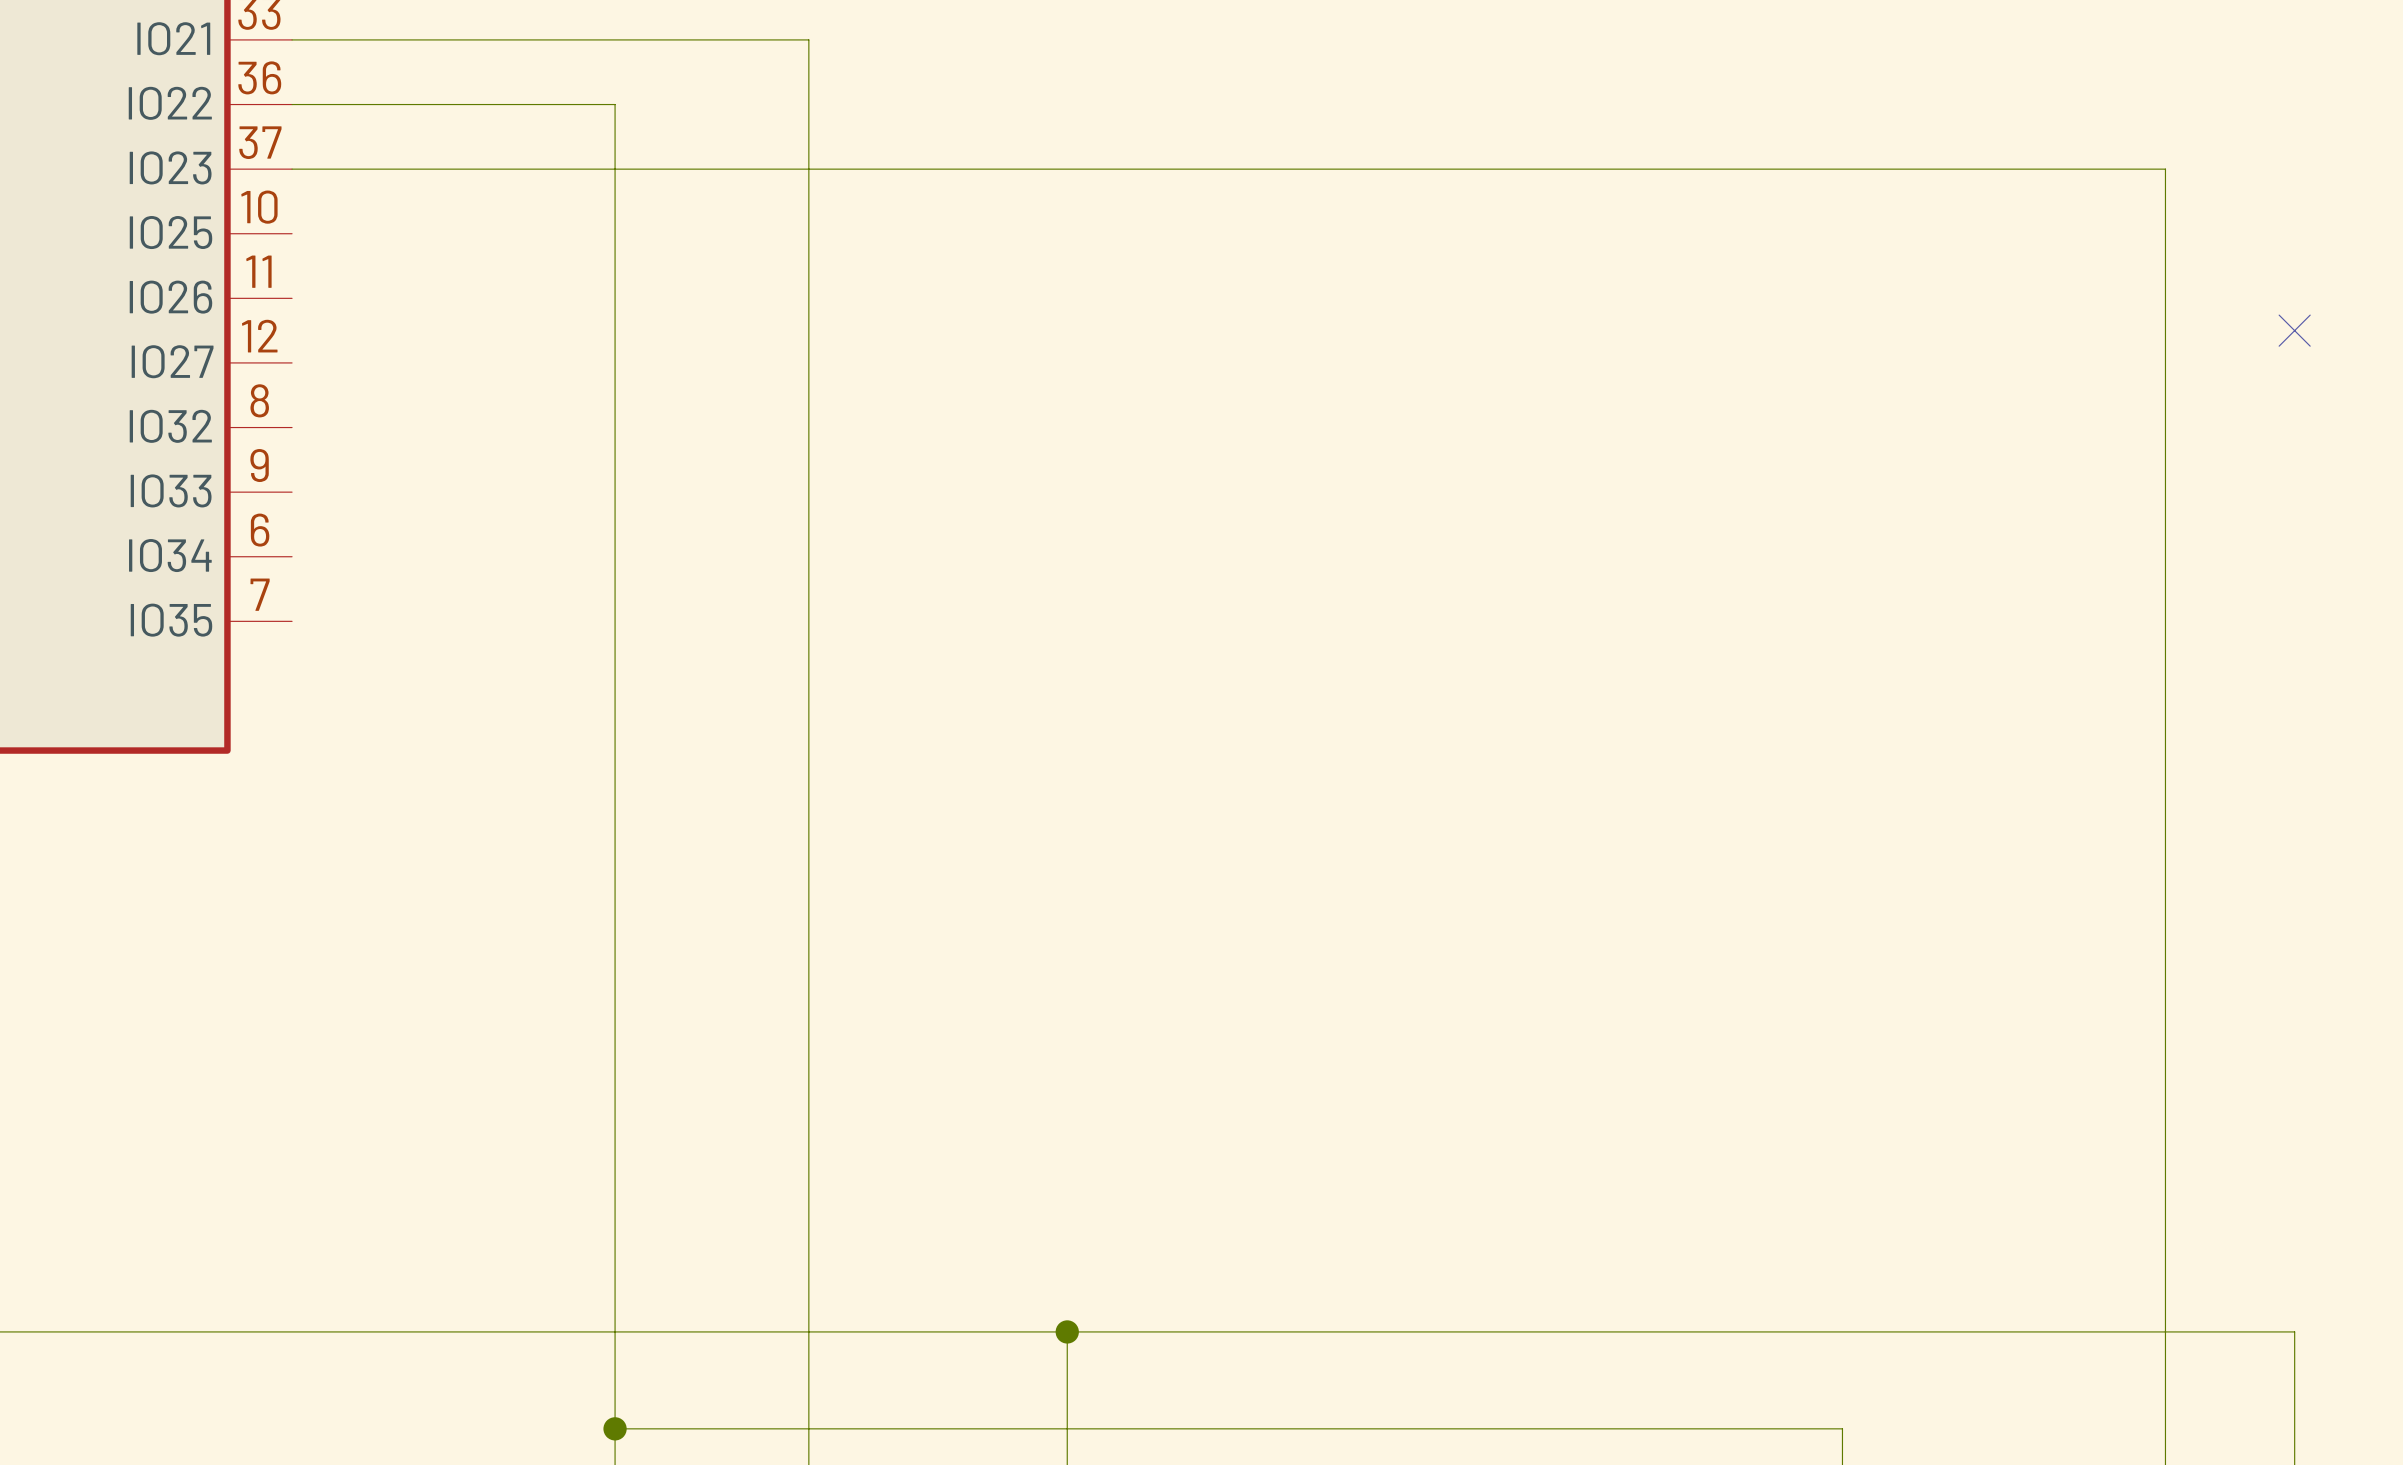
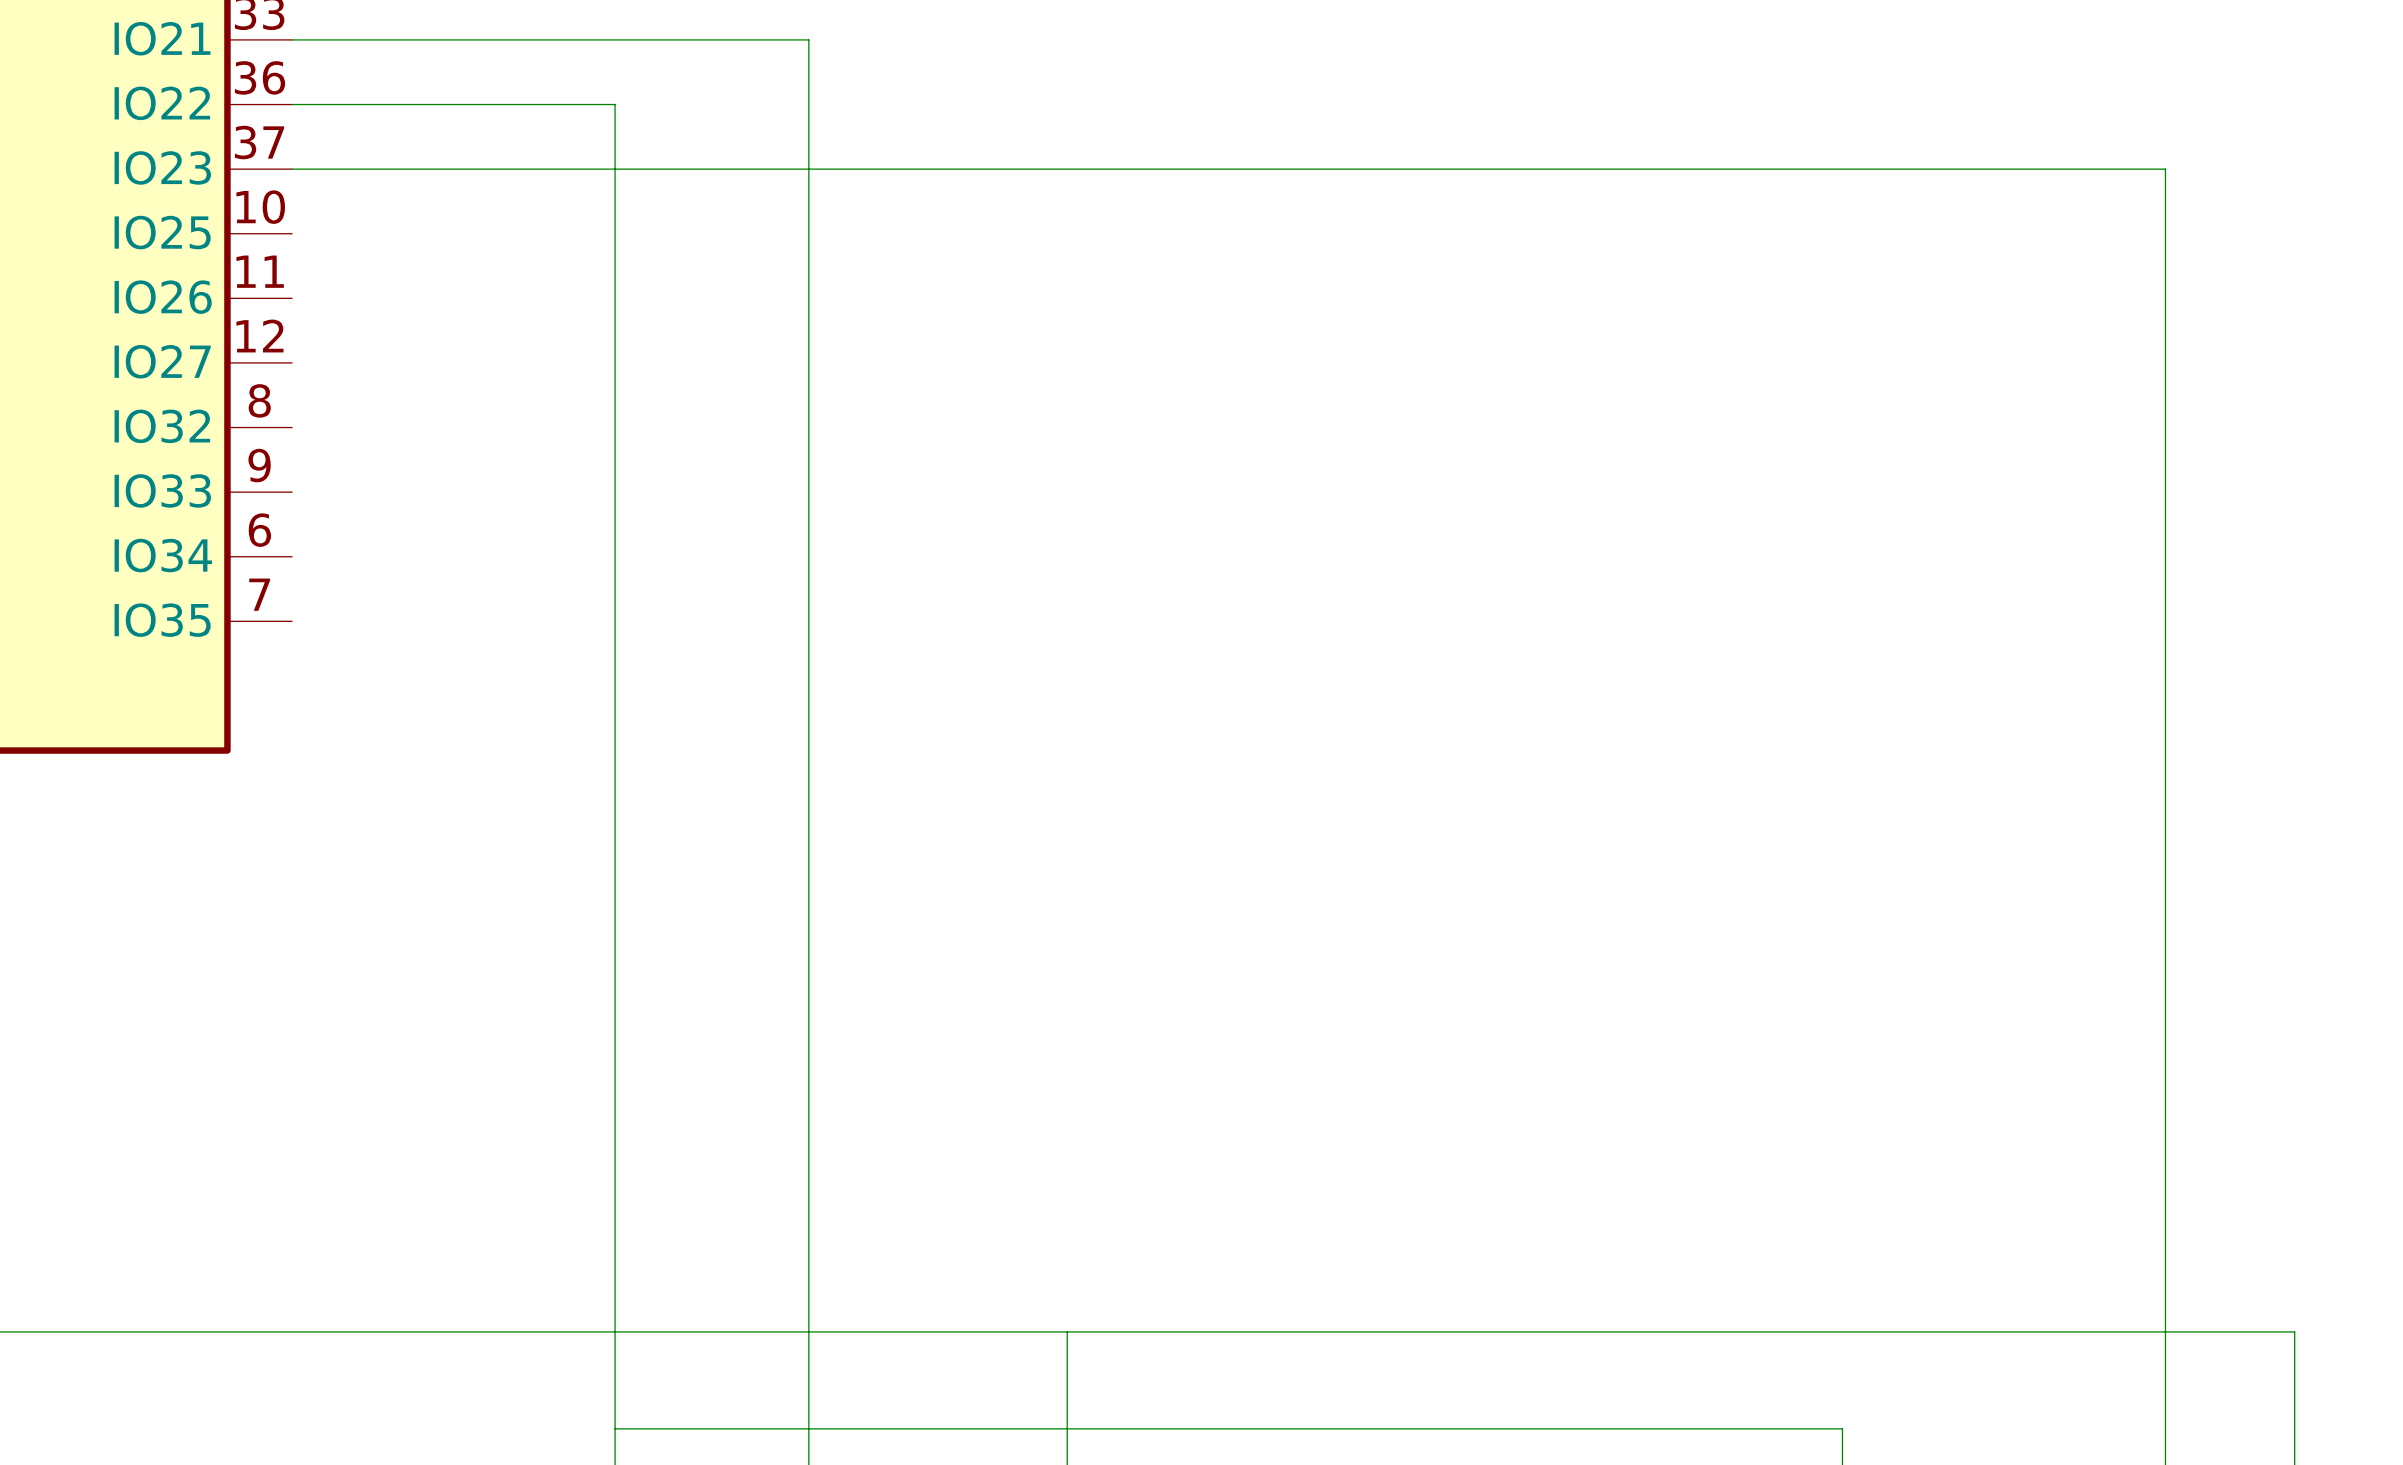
no-connect mark: (2294, 330) -> none
junction: (1067, 1331) -> none
junction: (615, 1428) -> none

